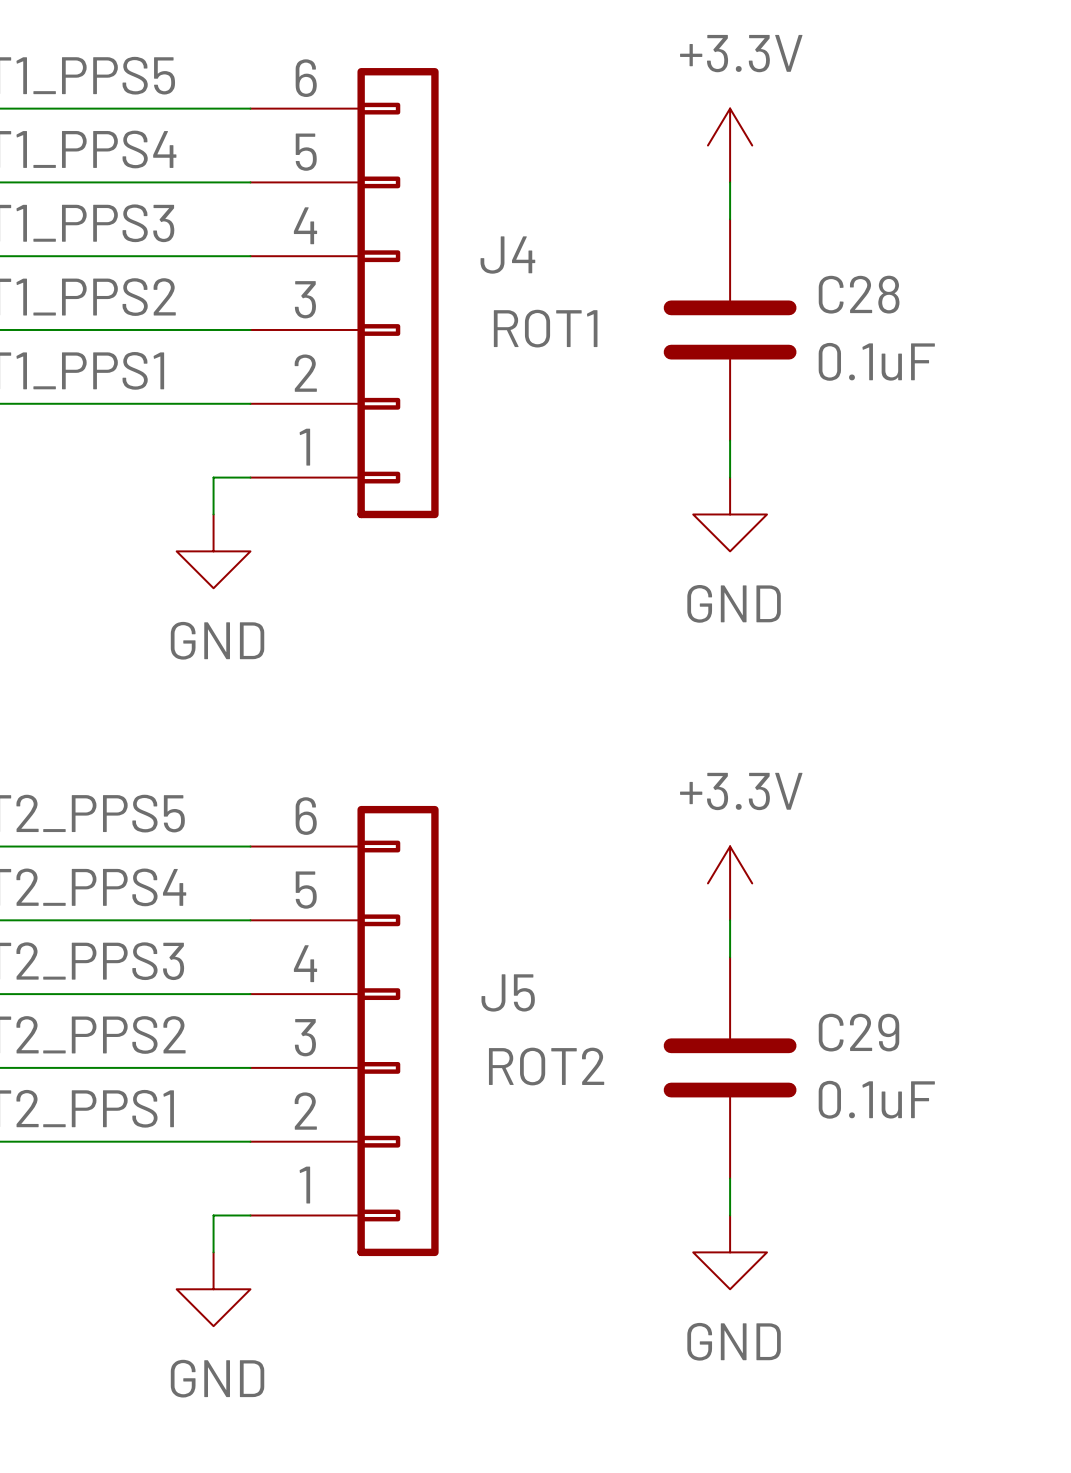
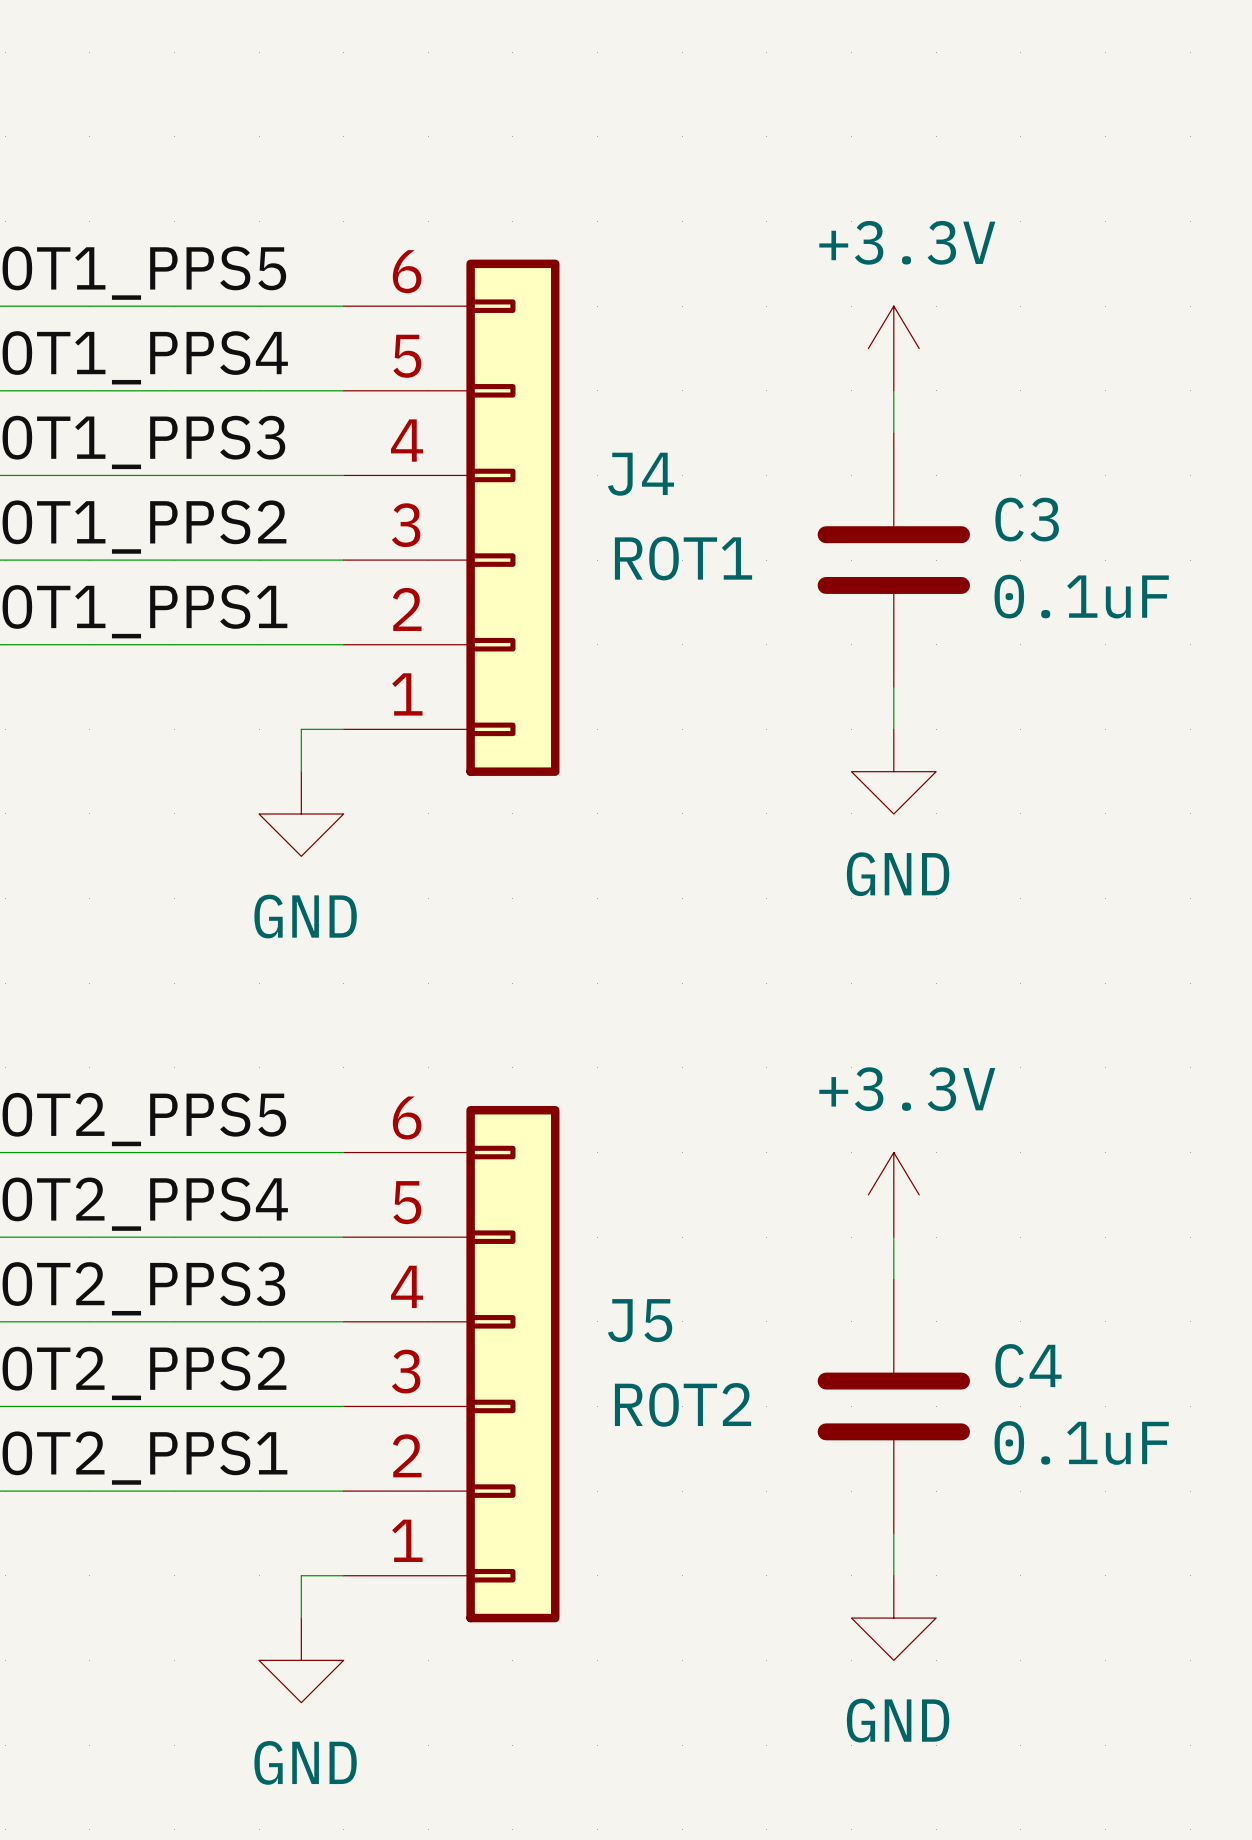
C28 name: C28 (859, 294) -> C3 (1027, 519)
C29 name: C29 (859, 1032) -> C4 (1028, 1365)

